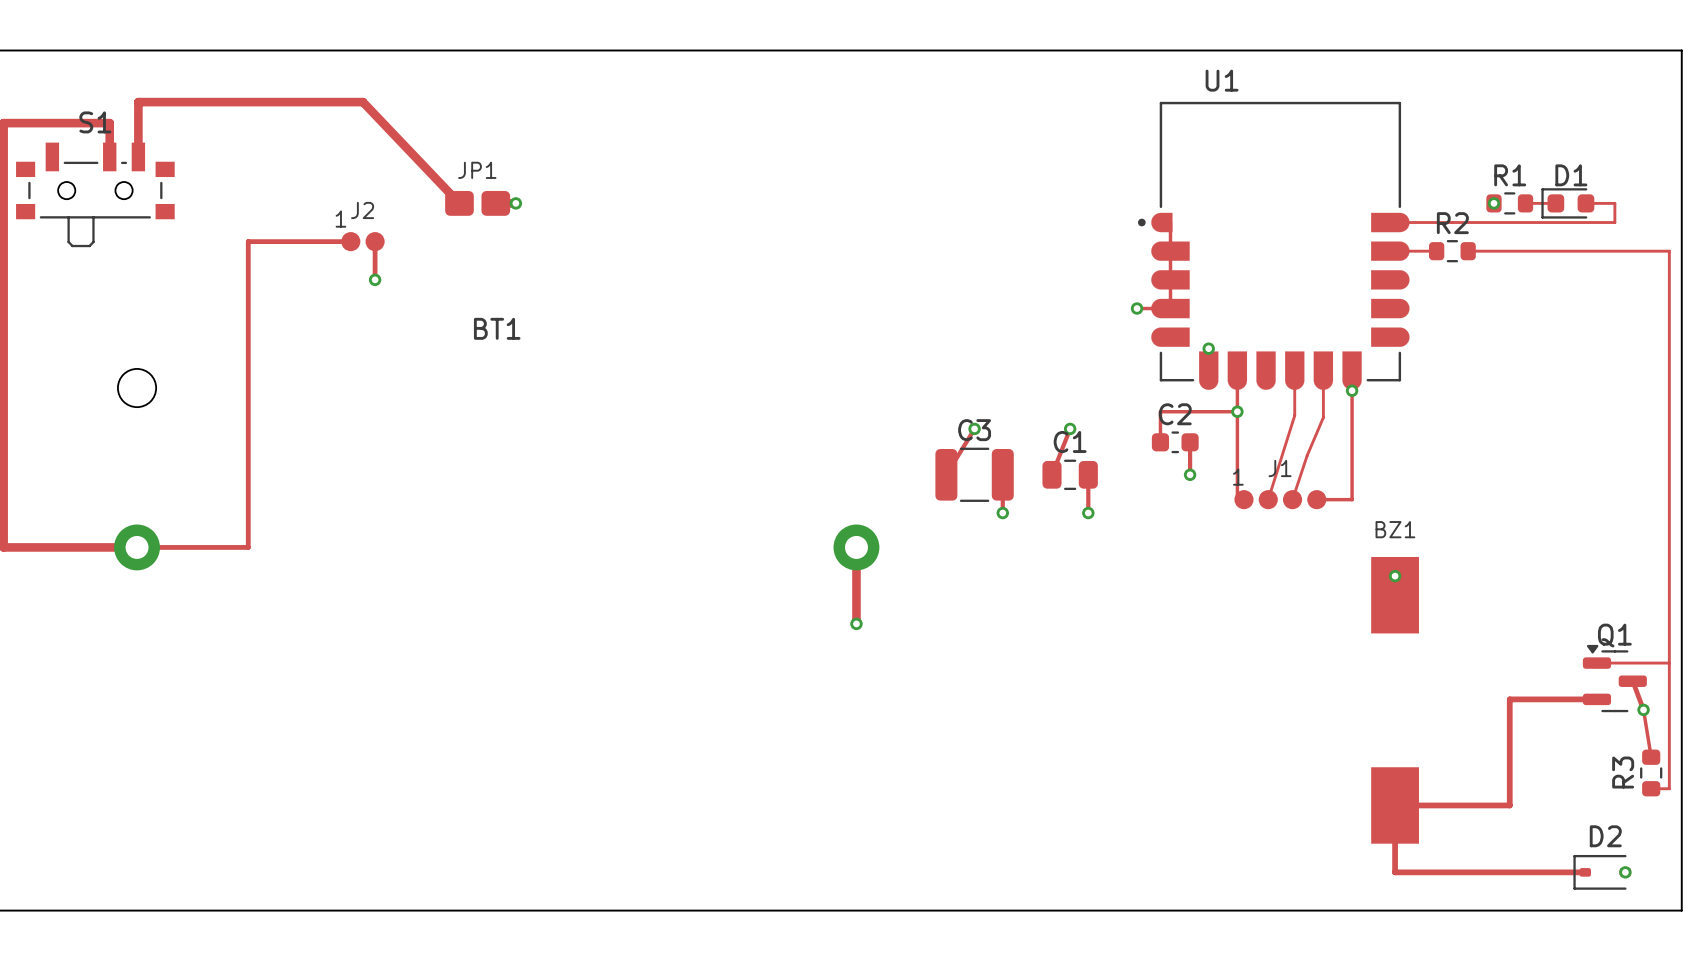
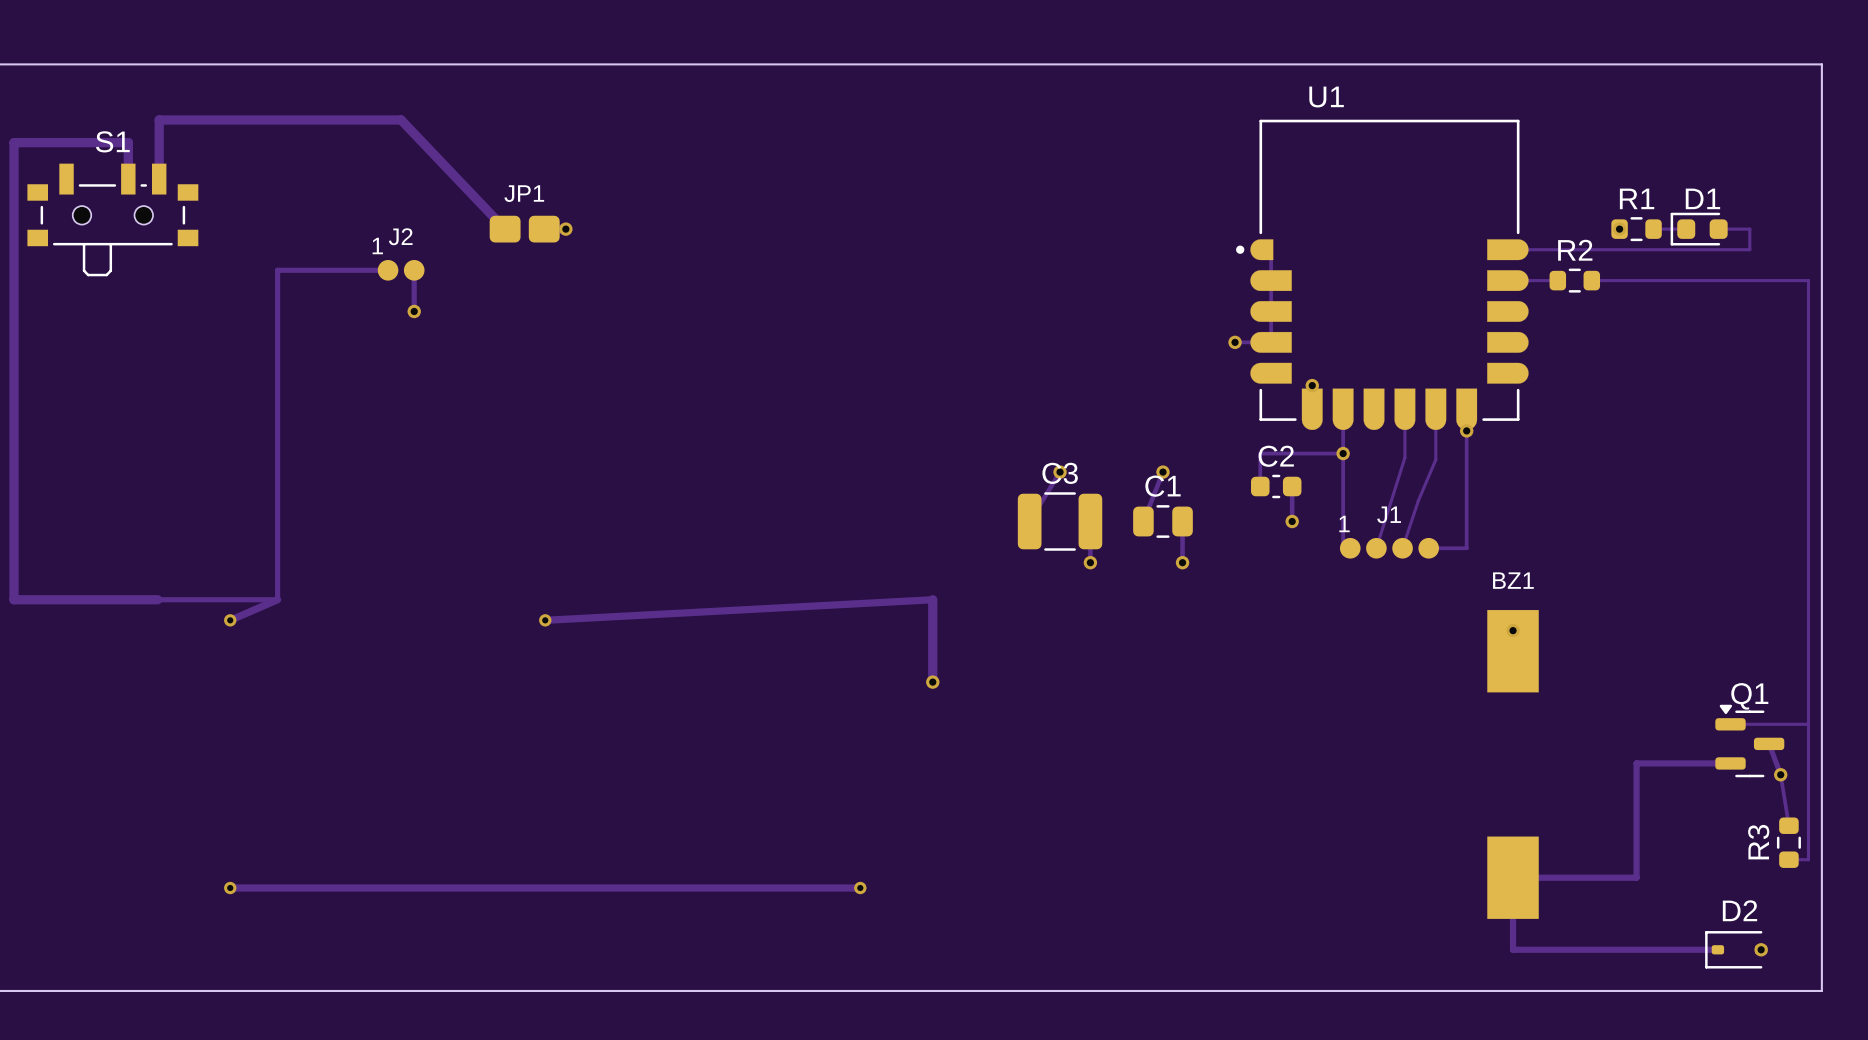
BT1: (496, 469) -> none
track: none -> (277, 599) (230, 620)
track: none -> (932, 599) (545, 620)
via: none -> (230, 620)
via: none -> (545, 620)
track: none -> (230, 888) (860, 888)
via: none -> (230, 888)
via: none -> (860, 888)

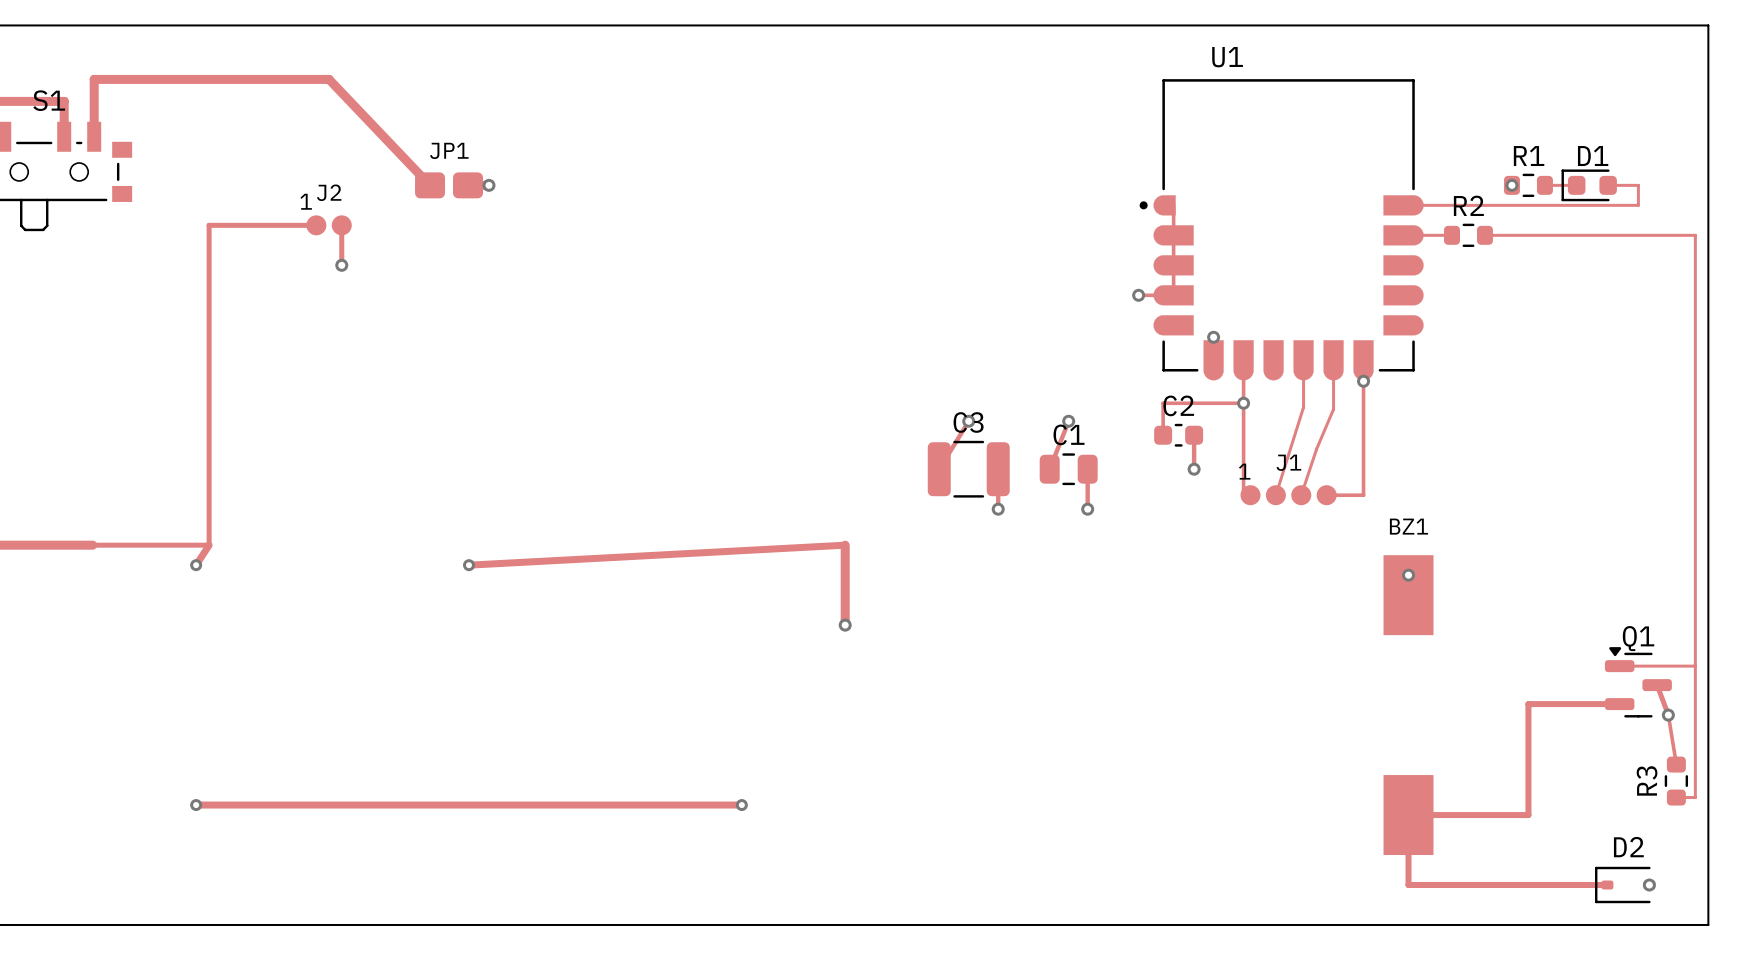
track: (277, 599) (230, 620) -> (209, 545) (196, 565)
via position: (230, 620) -> (196, 565)
track: none -> (196, 805) (741, 805)
track: (230, 888) (860, 888) -> none
via position: (230, 888) -> (196, 805)
via position: (860, 888) -> (741, 805)

